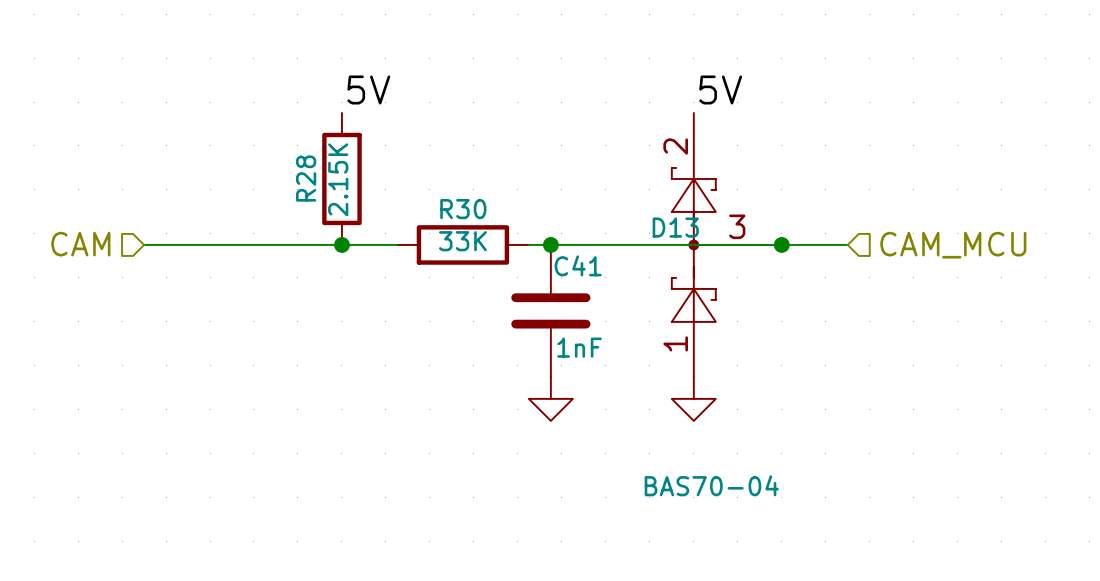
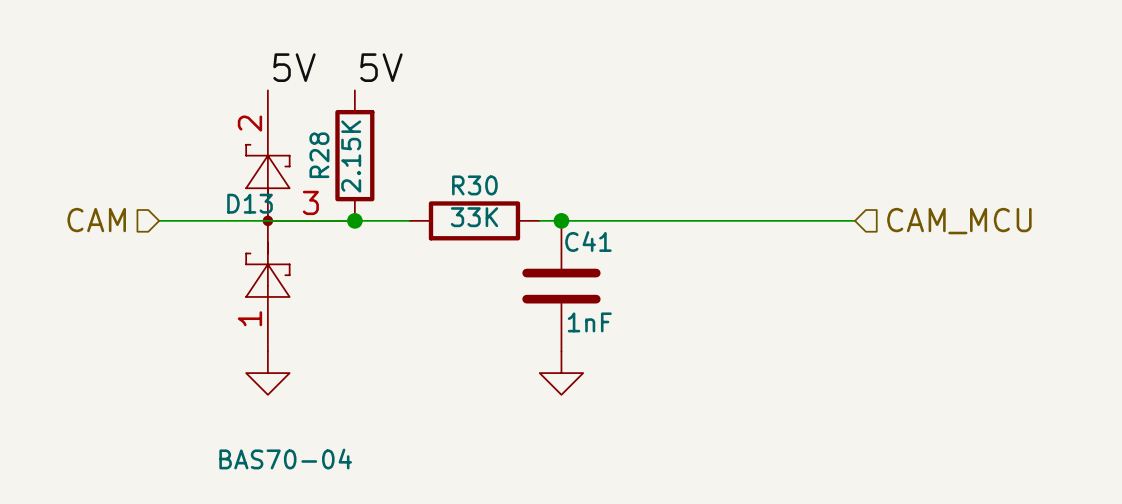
label: none -> 5V (294, 67)
label: 5V (720, 89) -> none
D13 position: (726, 244) -> (300, 220)
junction: (781, 244) -> none
power symbol: none -> (267, 373)
power symbol: (693, 398) -> none

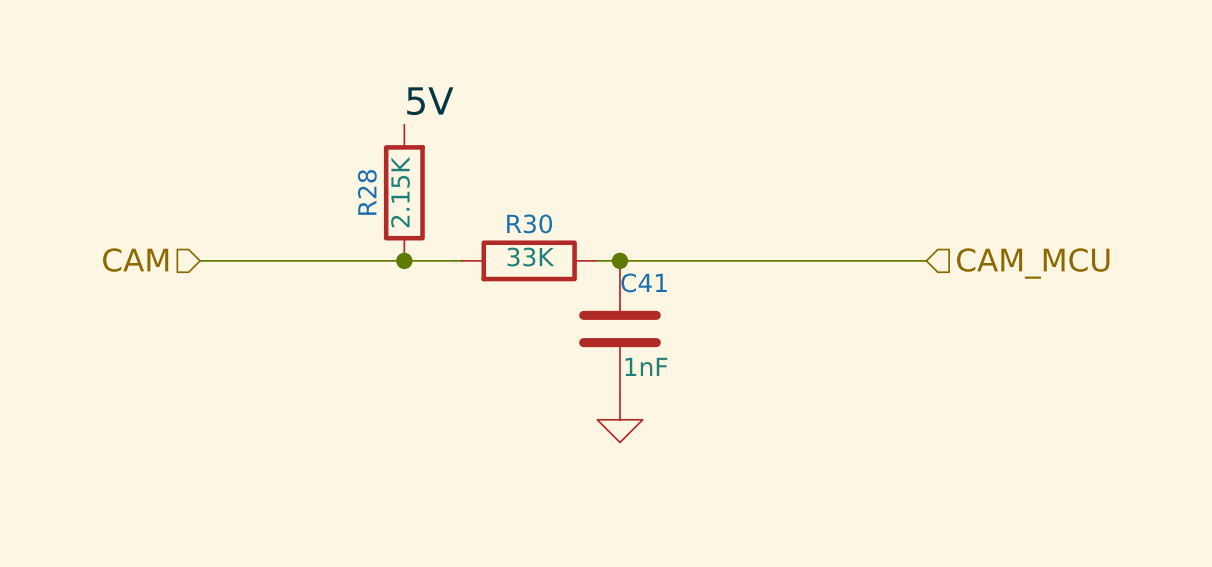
label: 5V (294, 67) -> none
D13: BAS70-04 (300, 220) -> none
power symbol: (267, 373) -> none

